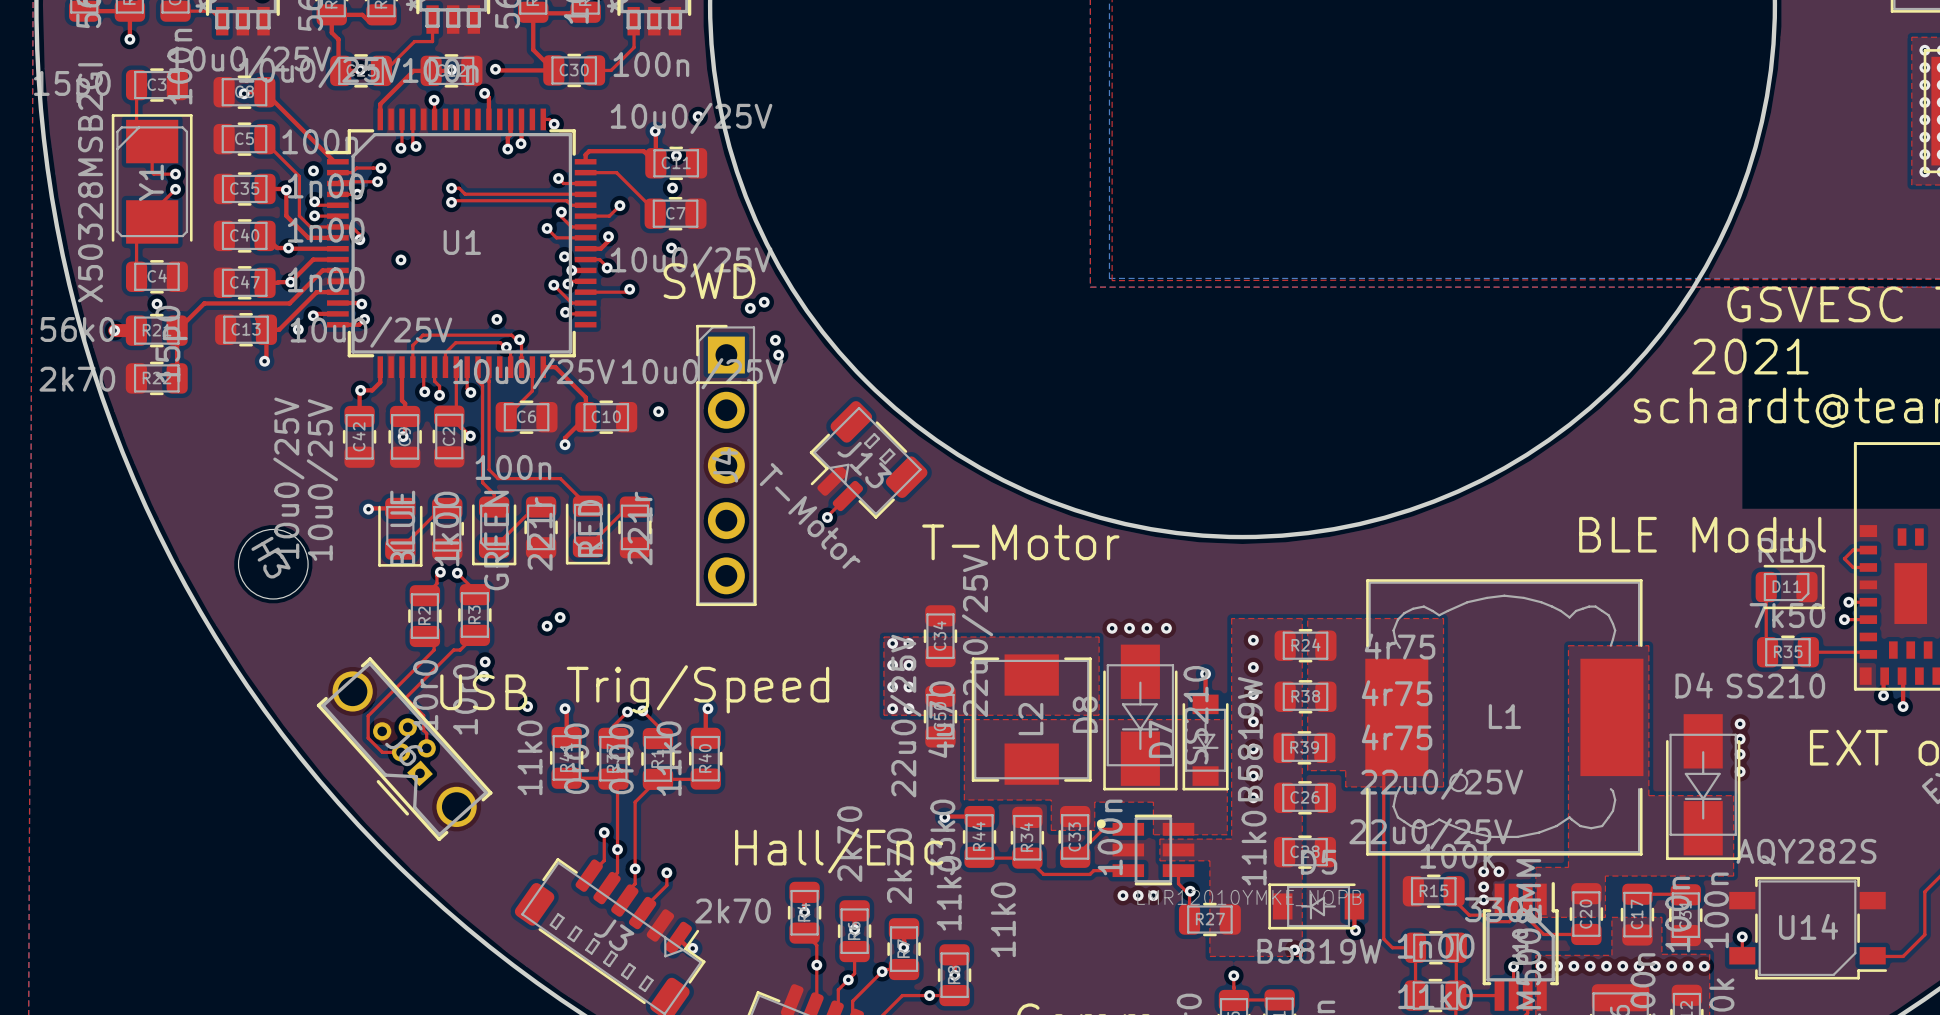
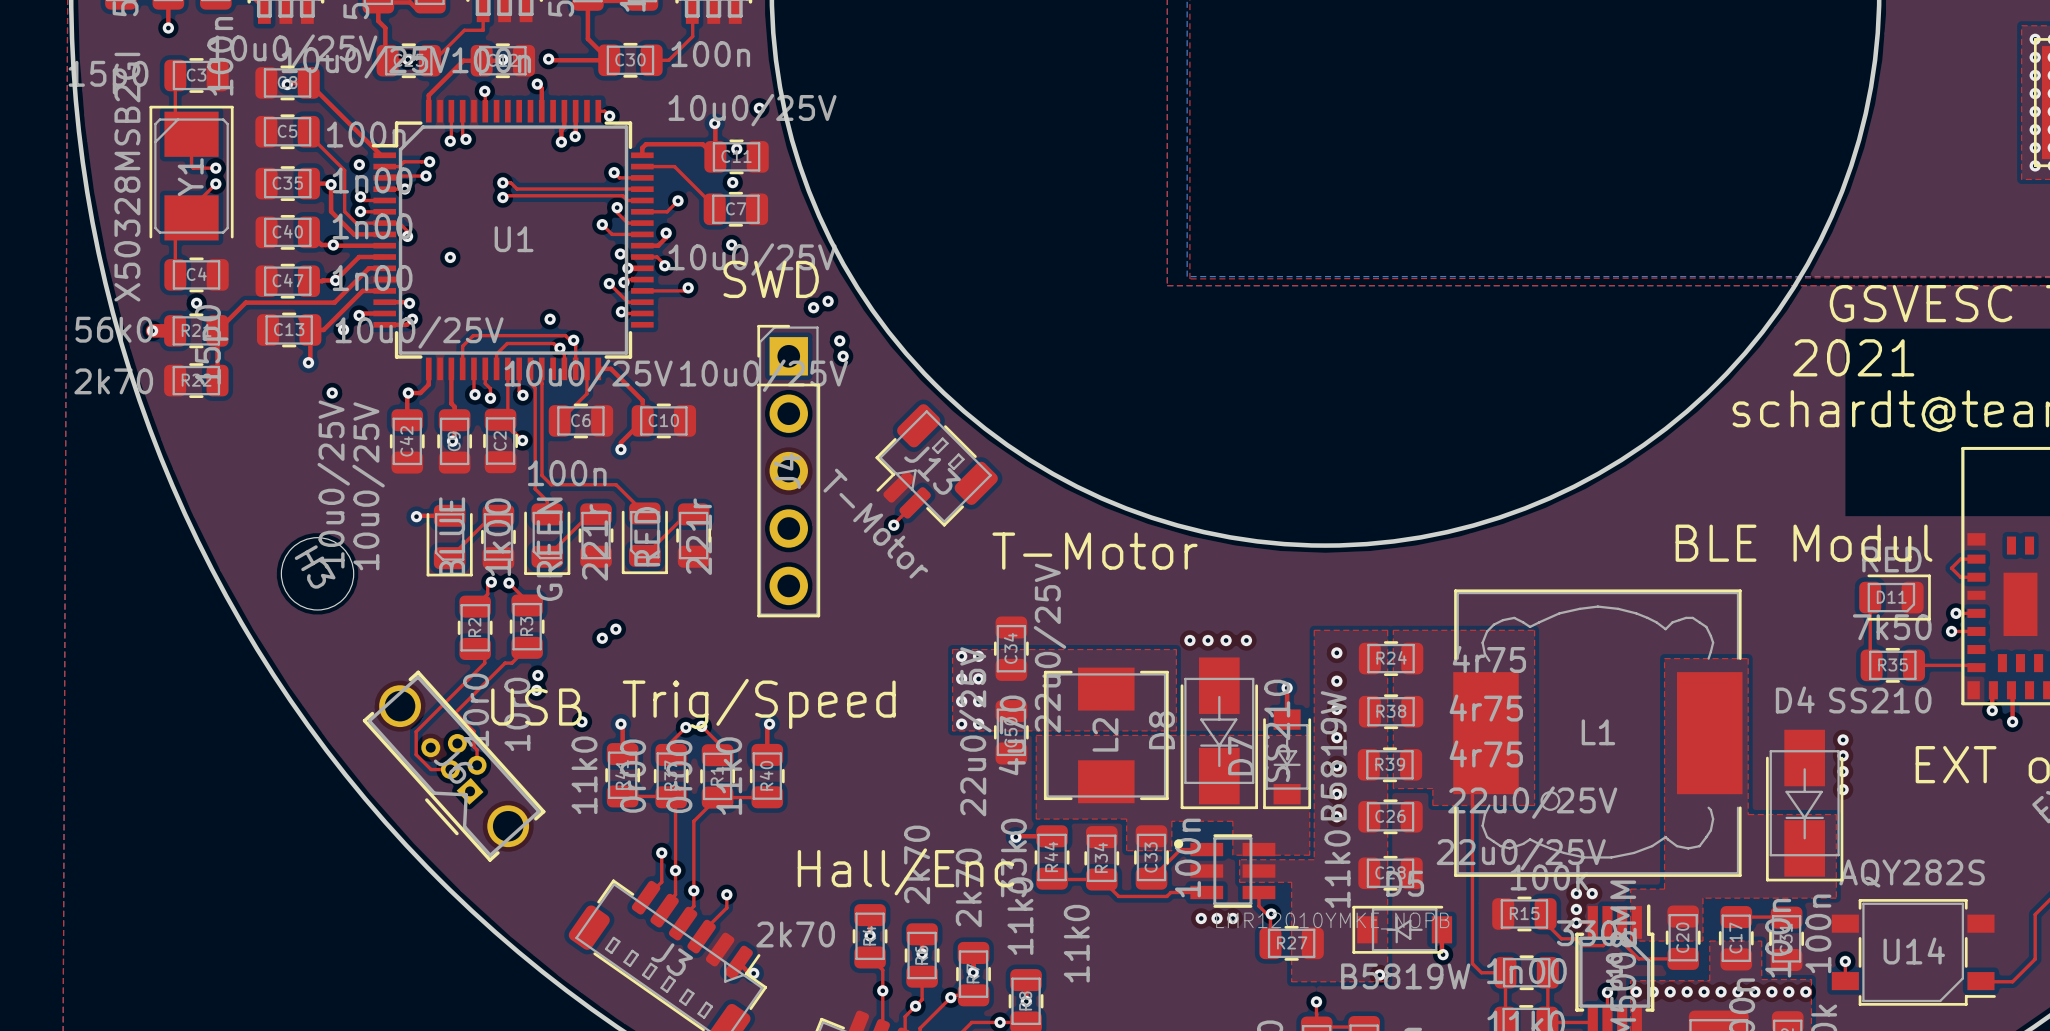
via: none -> (332, 393)
via: (658, 411) -> none

